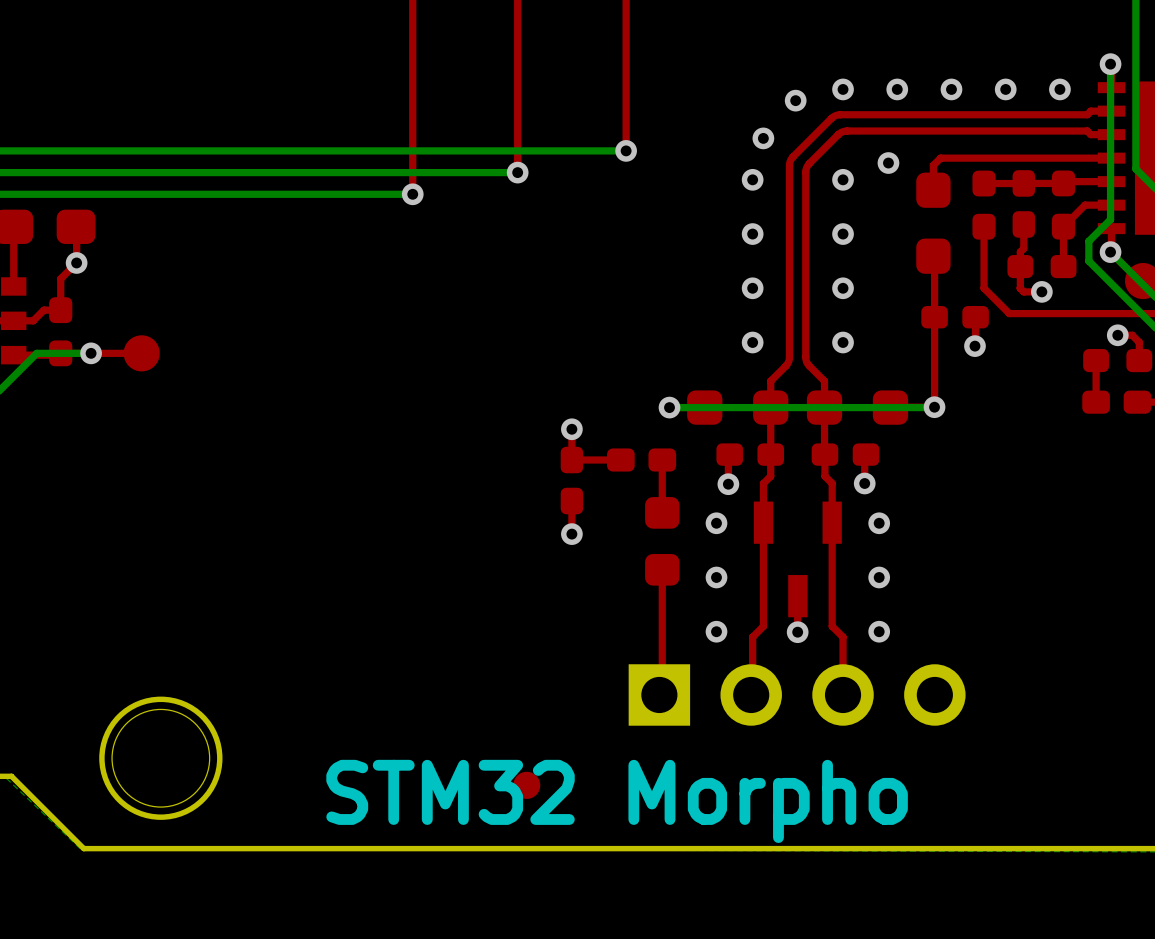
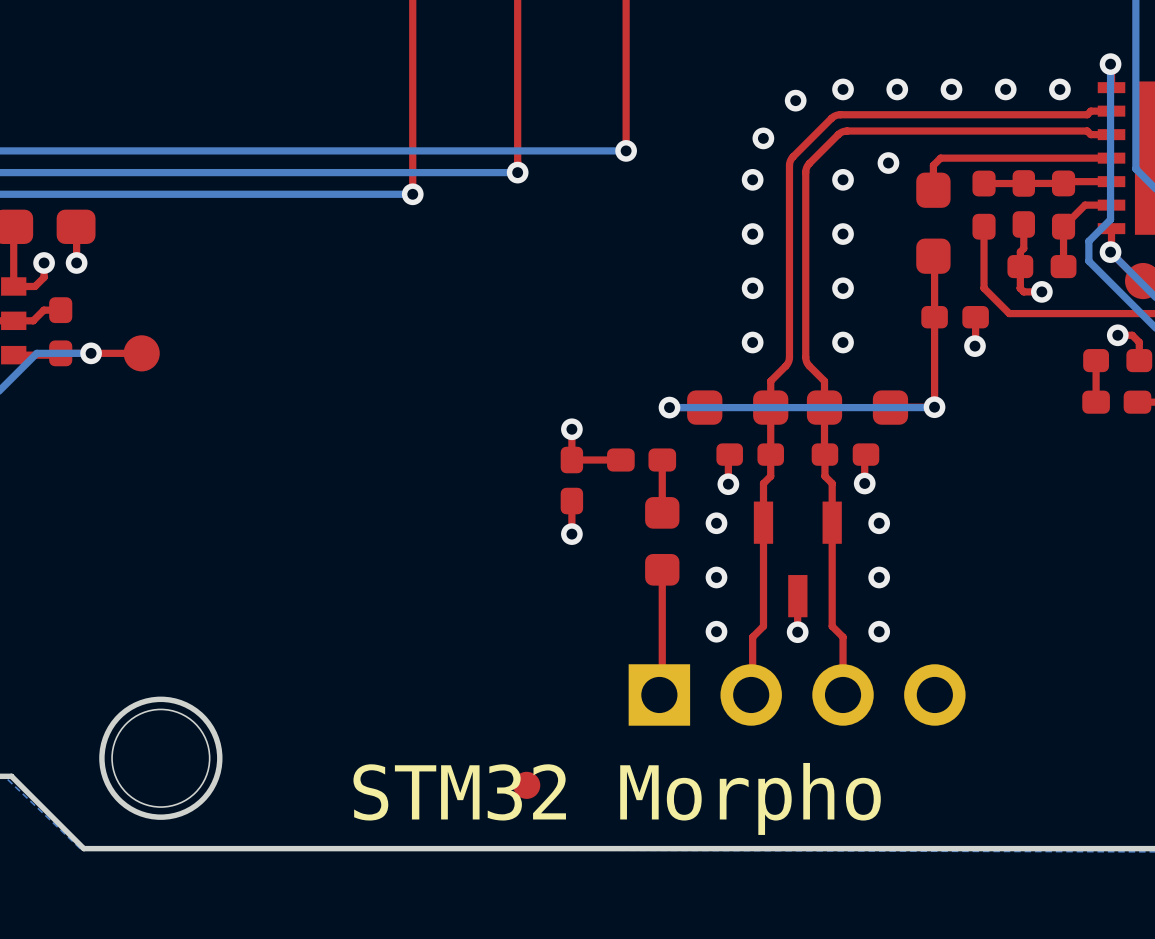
top track: none -> (44, 262) (44, 277) (35, 286) (13, 286)
via: none -> (44, 262)
top track: (76, 262) (60, 278) (60, 310) -> none

